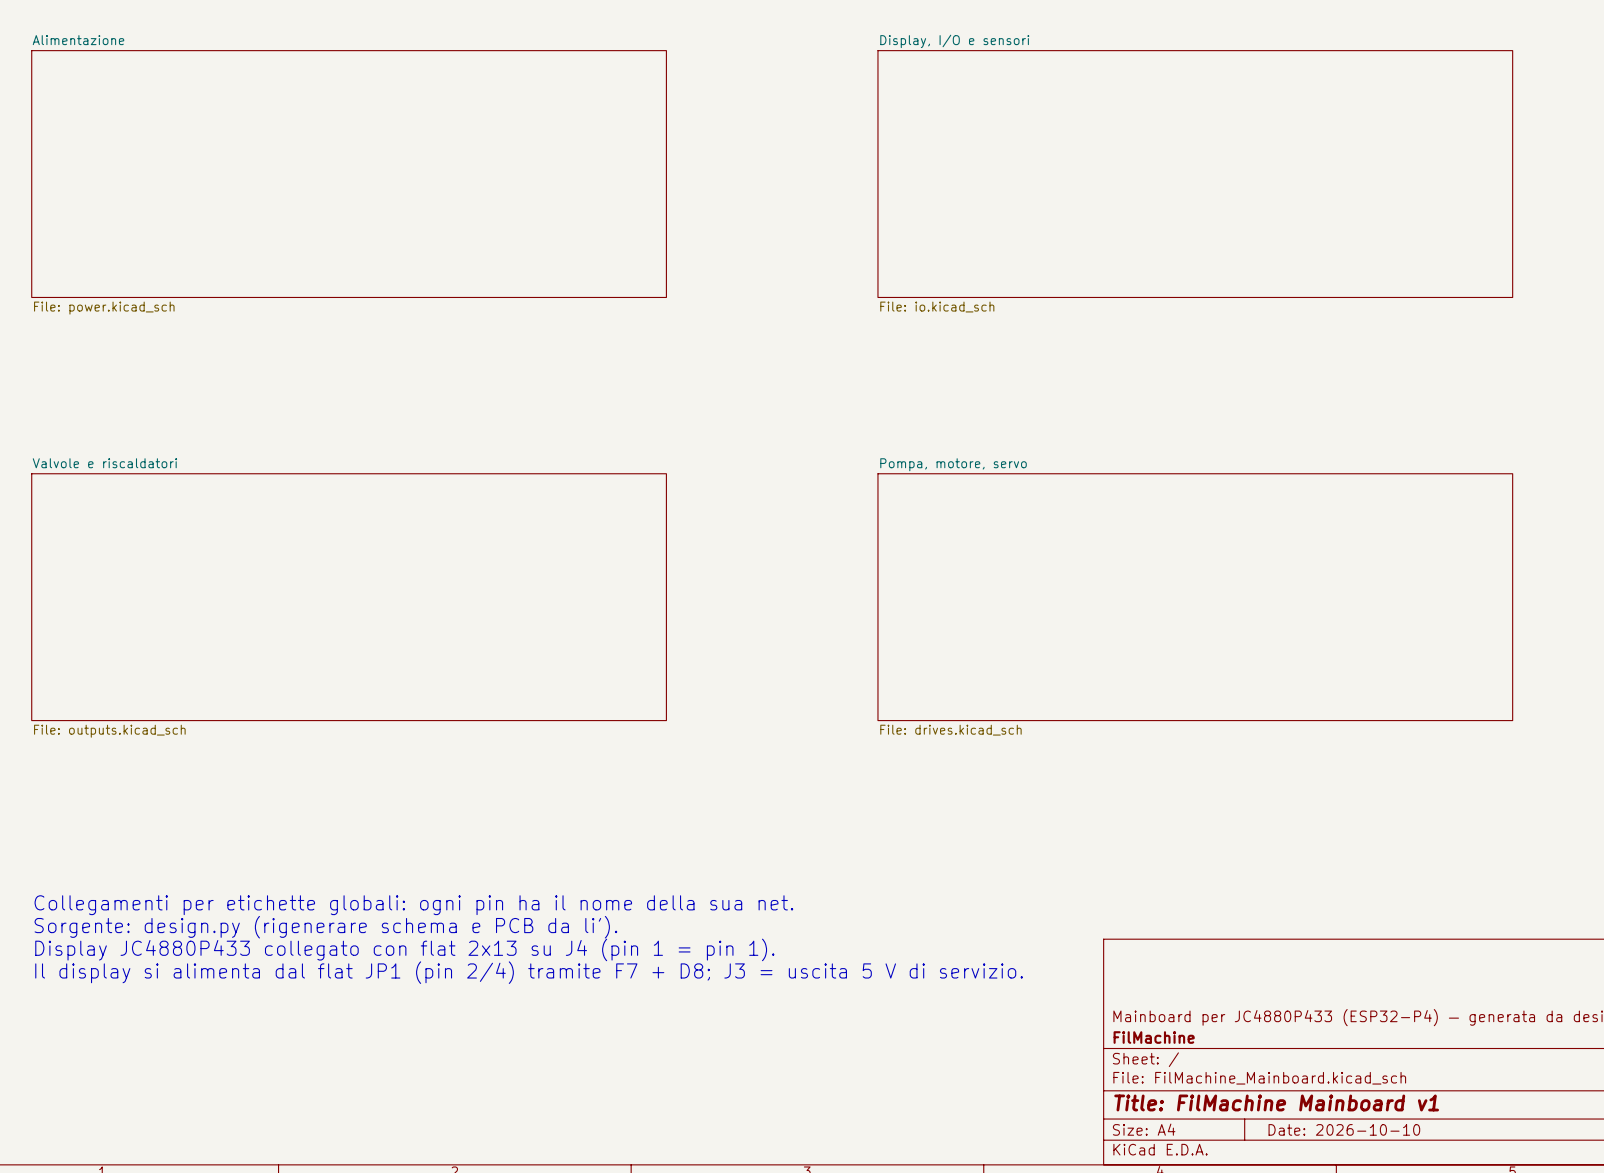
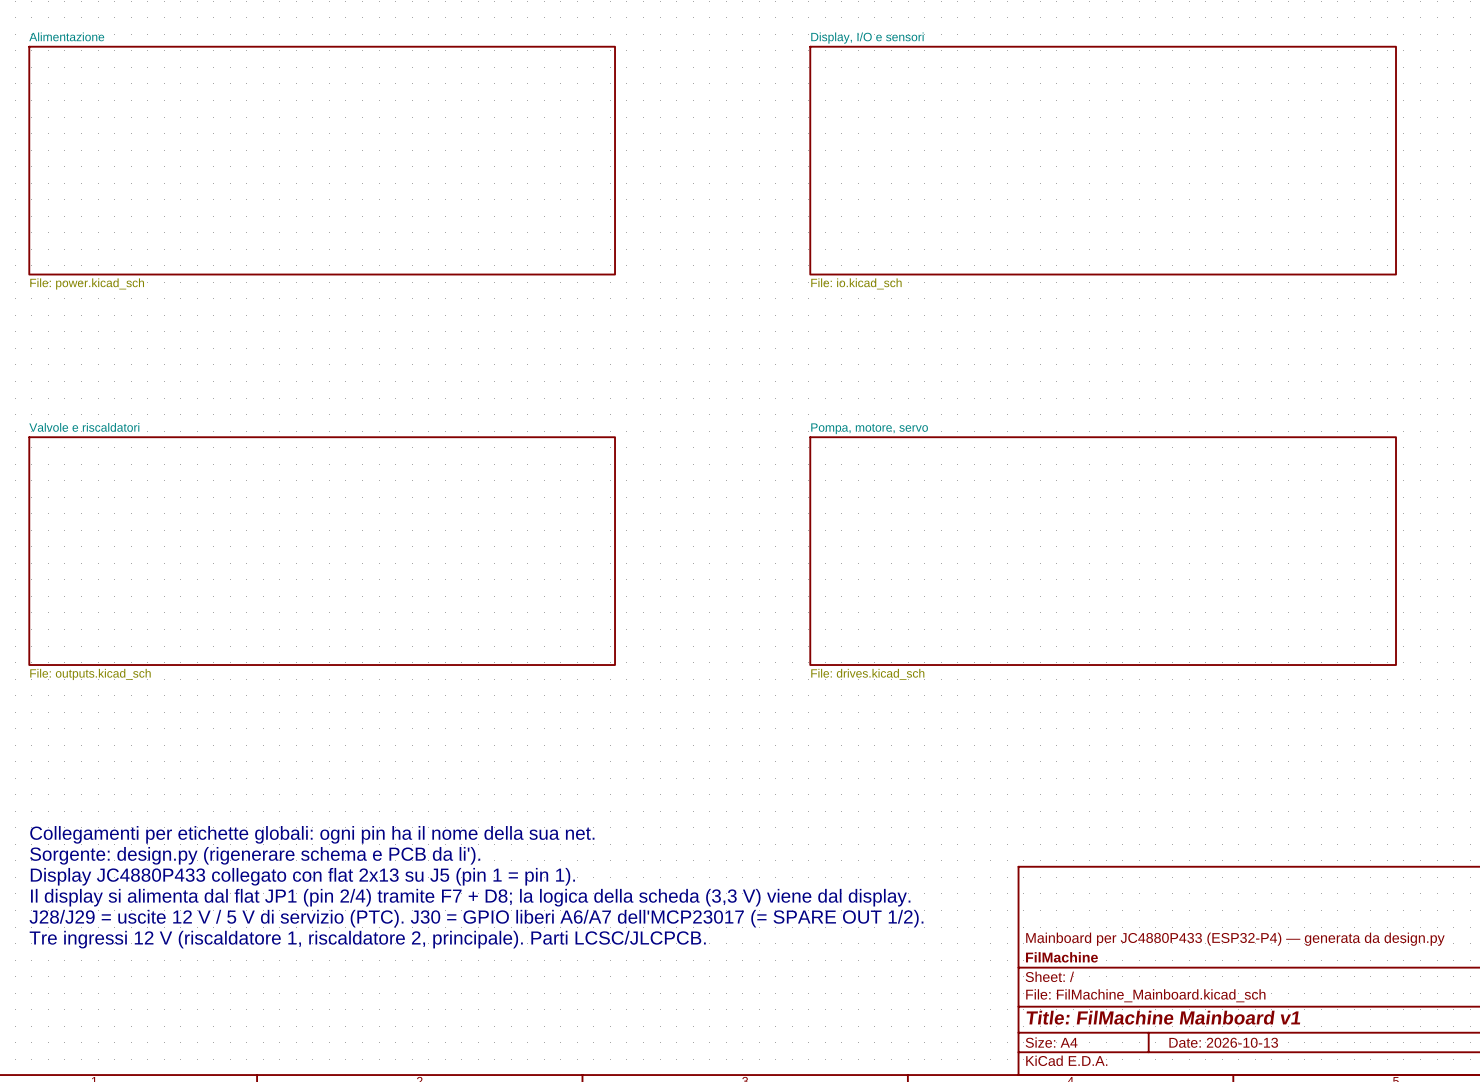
text: Display JC4880P433 collegato con flat 2x13 su J4 (pin 1 = pin 1). (404, 949) -> Display JC4880P433 collegato con flat 2x13 su J5 (pin 1 = pin 1). (302, 876)
text: Il display si alimenta dal flat JP1 (pin 2/4) tramite F7 + D8; J3 = uscita 5 V di servizio. (529, 972) -> Il display si alimenta dal flat JP1 (pin 2/4) tramite F7 + D8; la logica della scheda (3,3 V) viene dal display. (470, 897)
text: none -> J28/J29 = uscite 12 V / 5 V di servizio (PTC). J30 = GPIO liberi A6/A7 dell'MCP23017 (= SPARE OUT 1/2). (476, 918)
text: none -> Tre ingressi 12 V (riscaldatore 1, riscaldatore 2, principale). Parti LCSC/JLCPCB. (367, 939)
title block: Date: 2026-10-10 (1344, 1129) -> Date: 2026-10-13 (1223, 1042)

